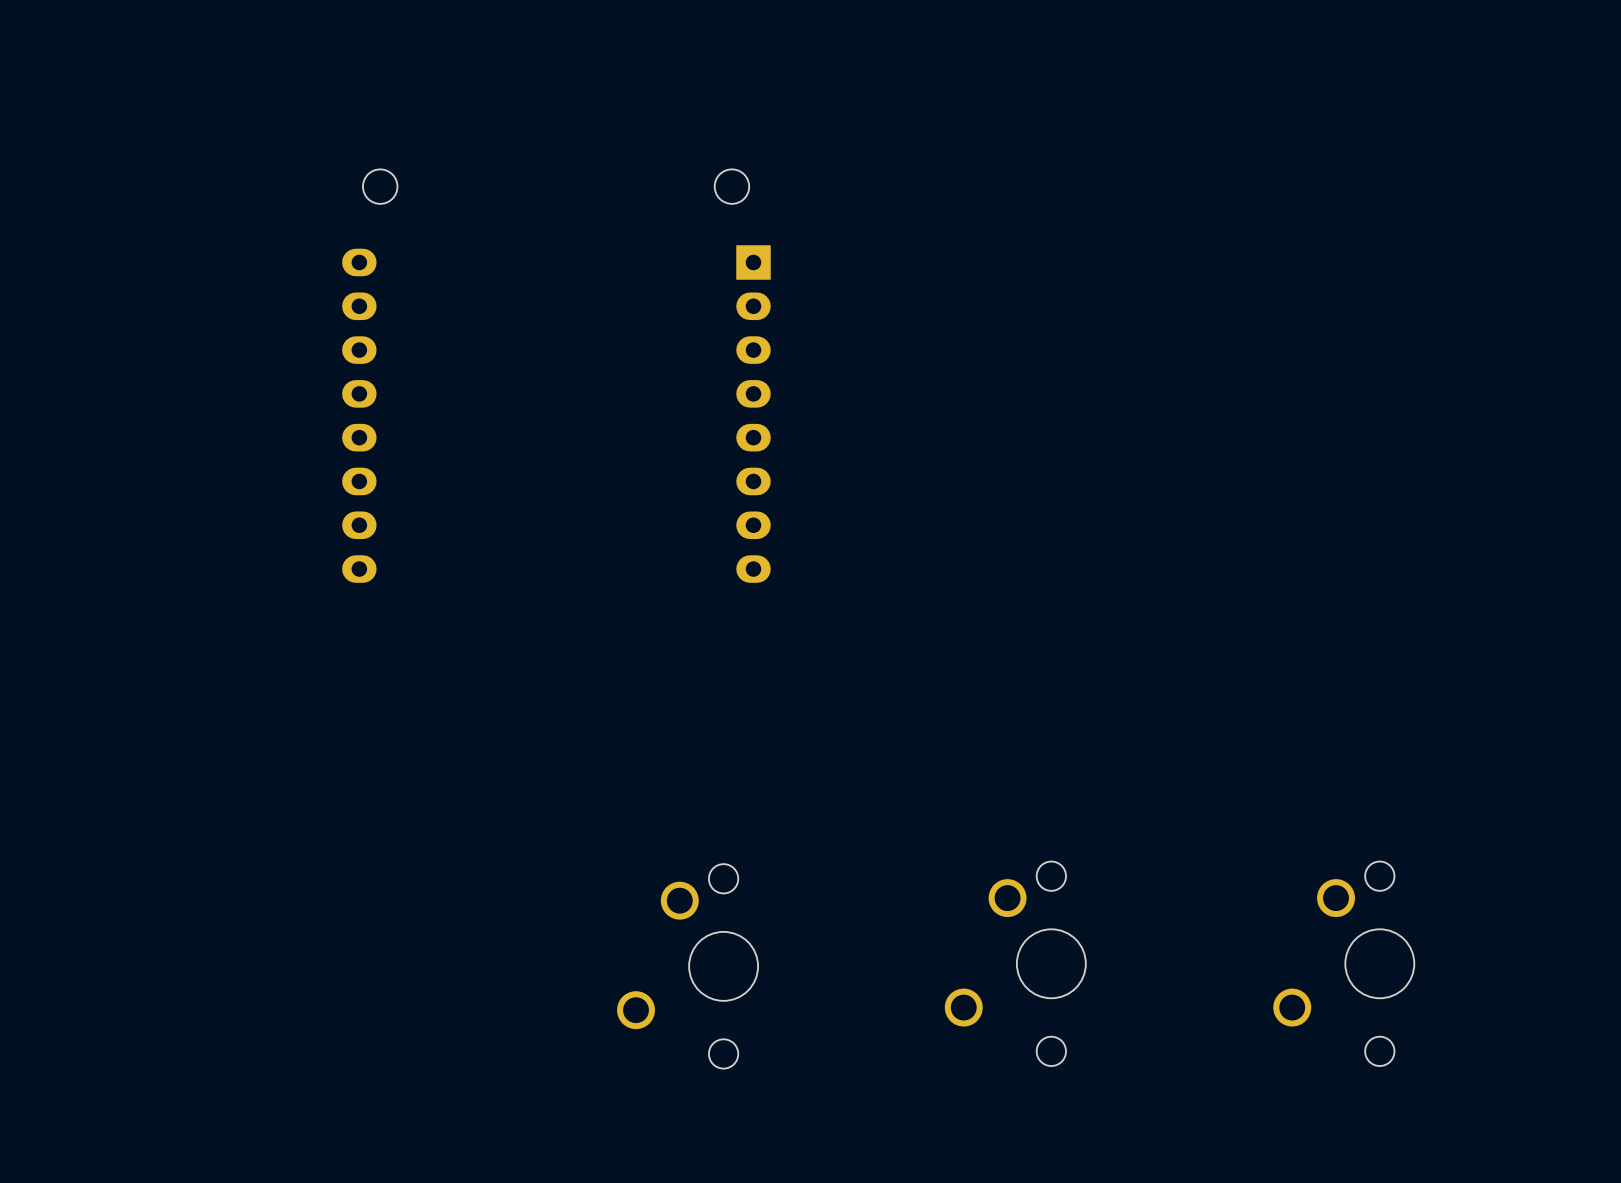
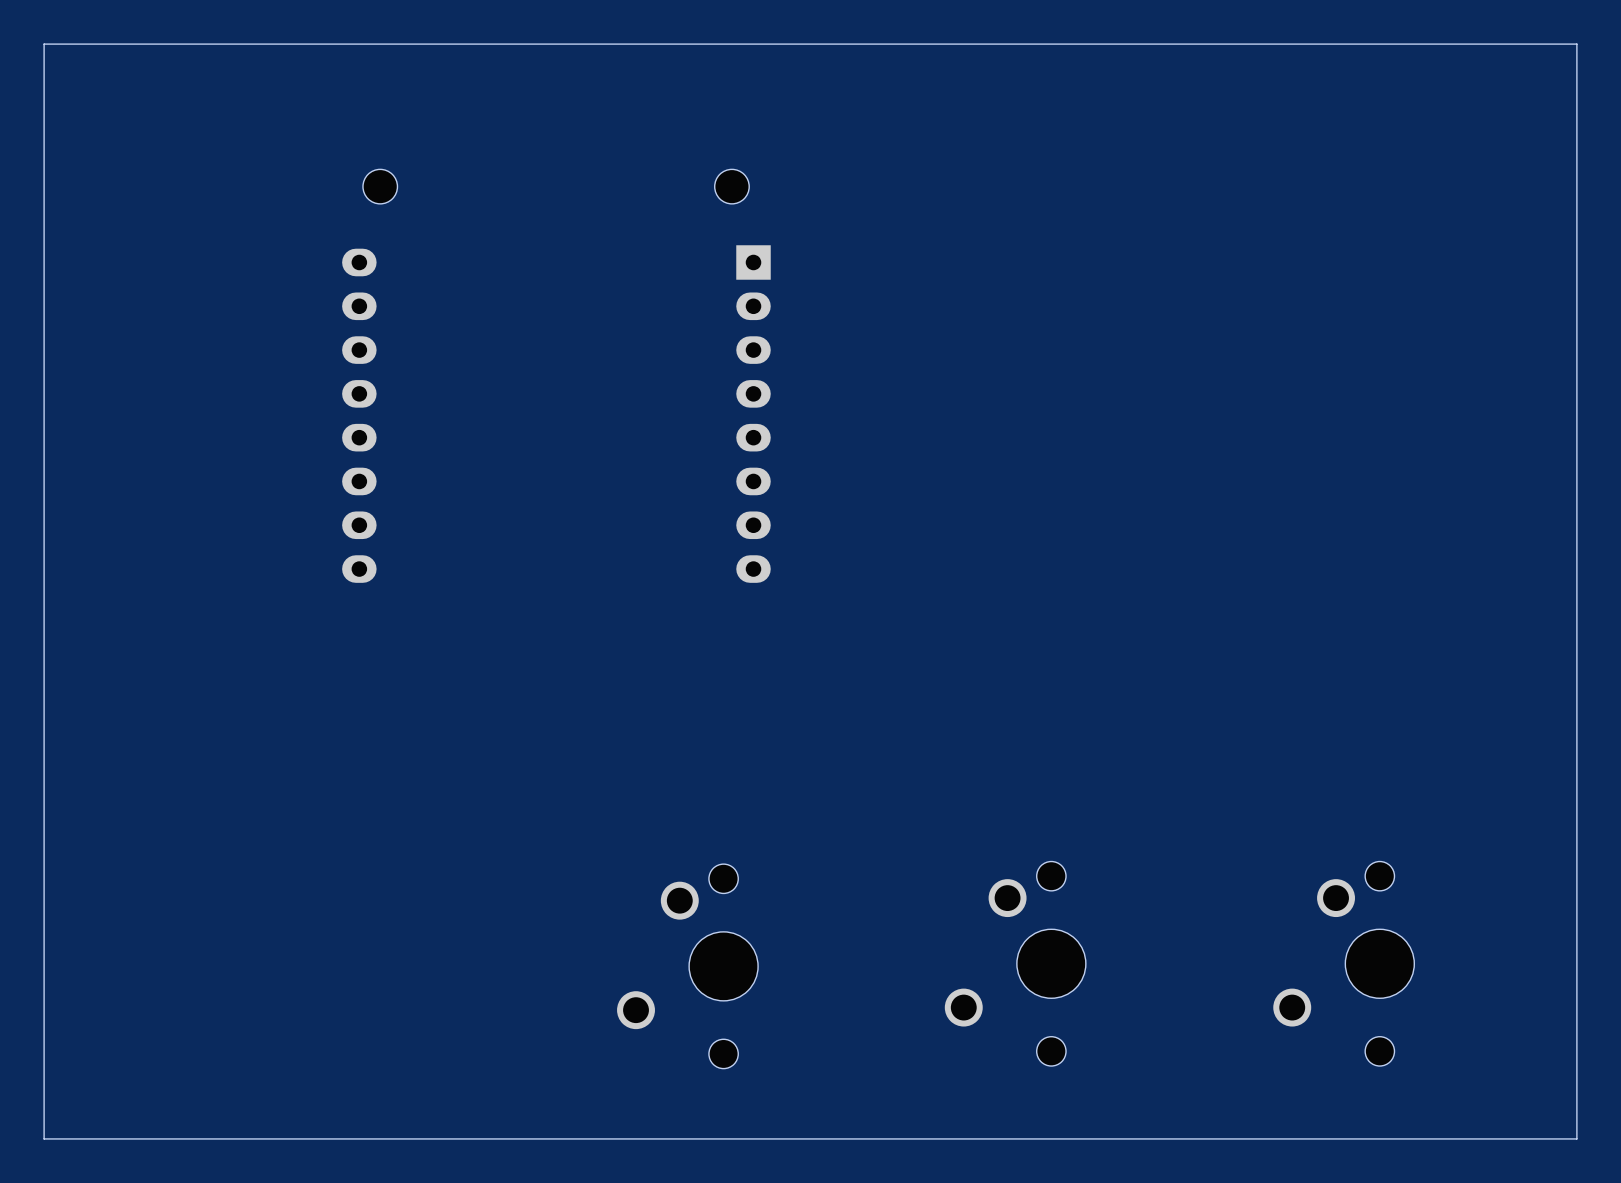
board edge: none -> (1576, 44) (44, 44) (44, 1138) (1576, 1138) (1576, 44)

